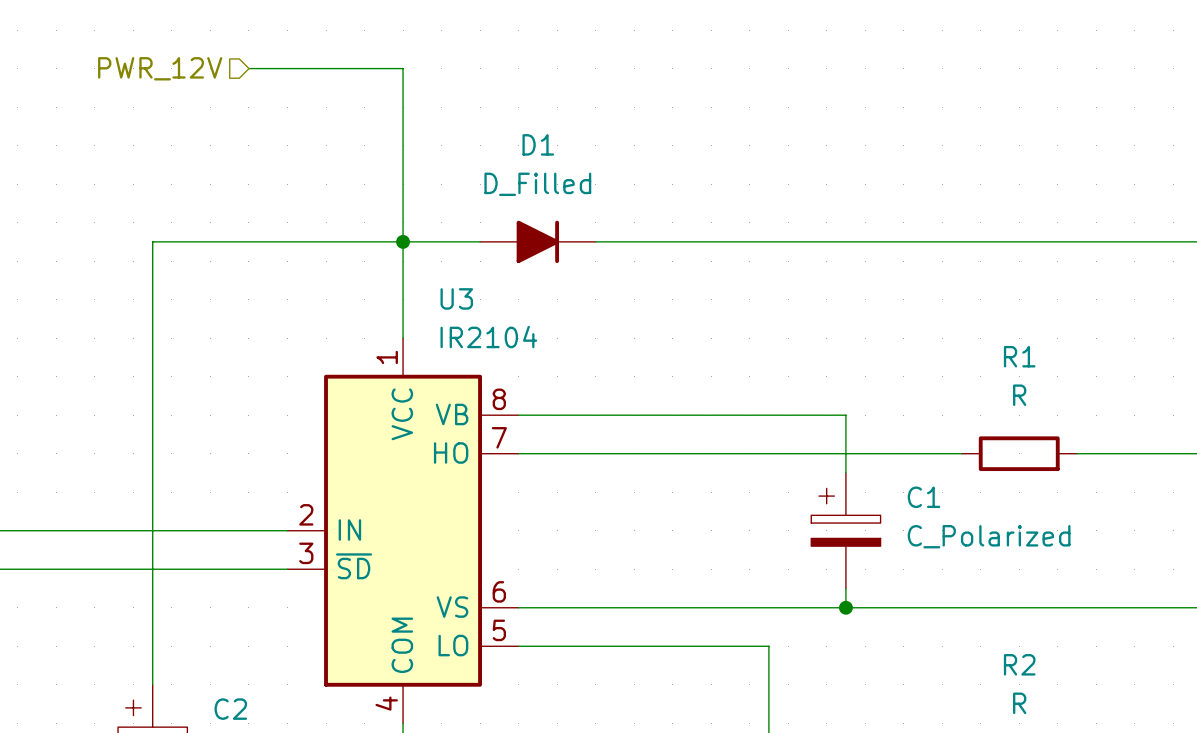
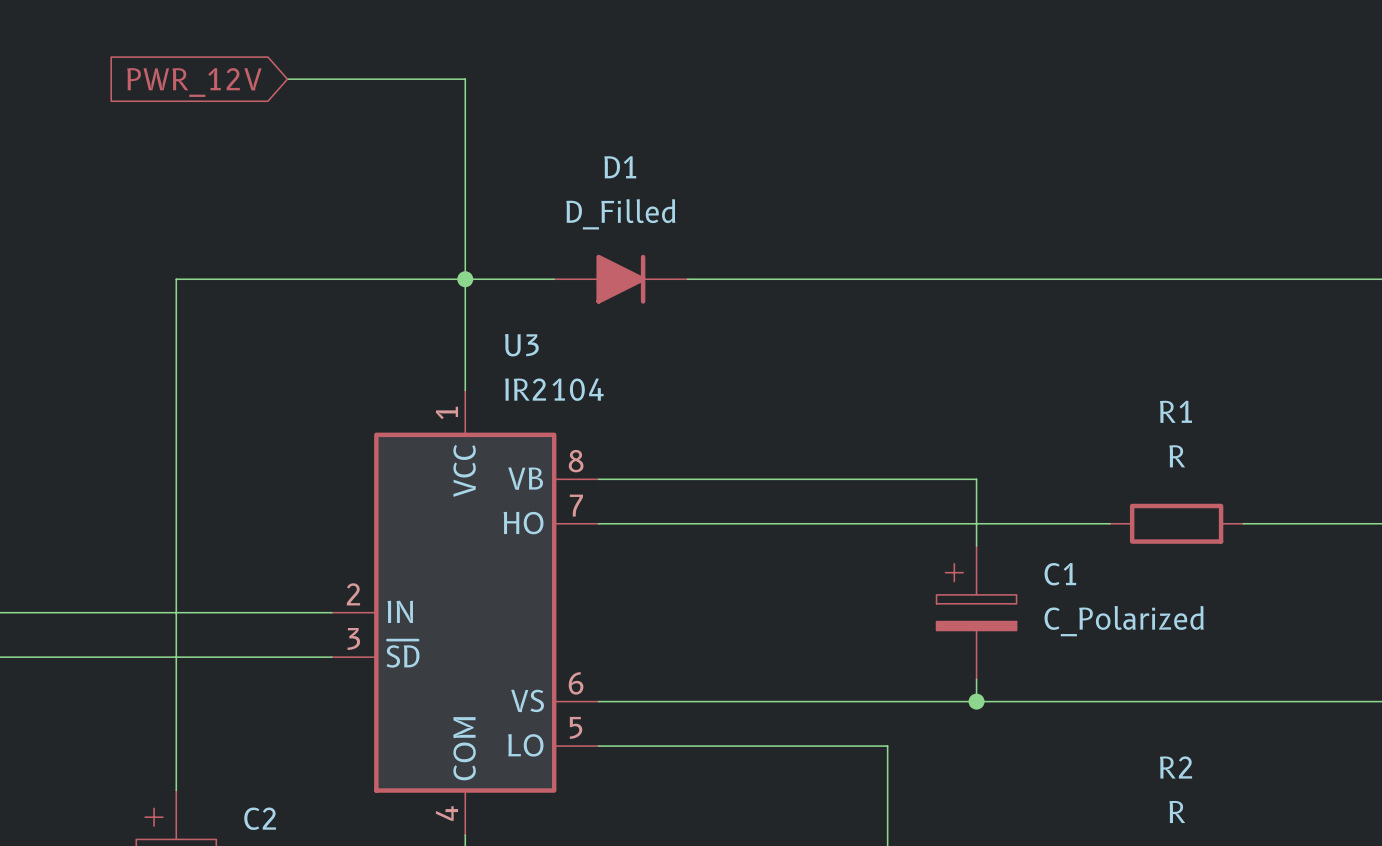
hierarchical label: PWR_12V (160, 68) -> none
global label: none -> PWR_12V (194, 82)

